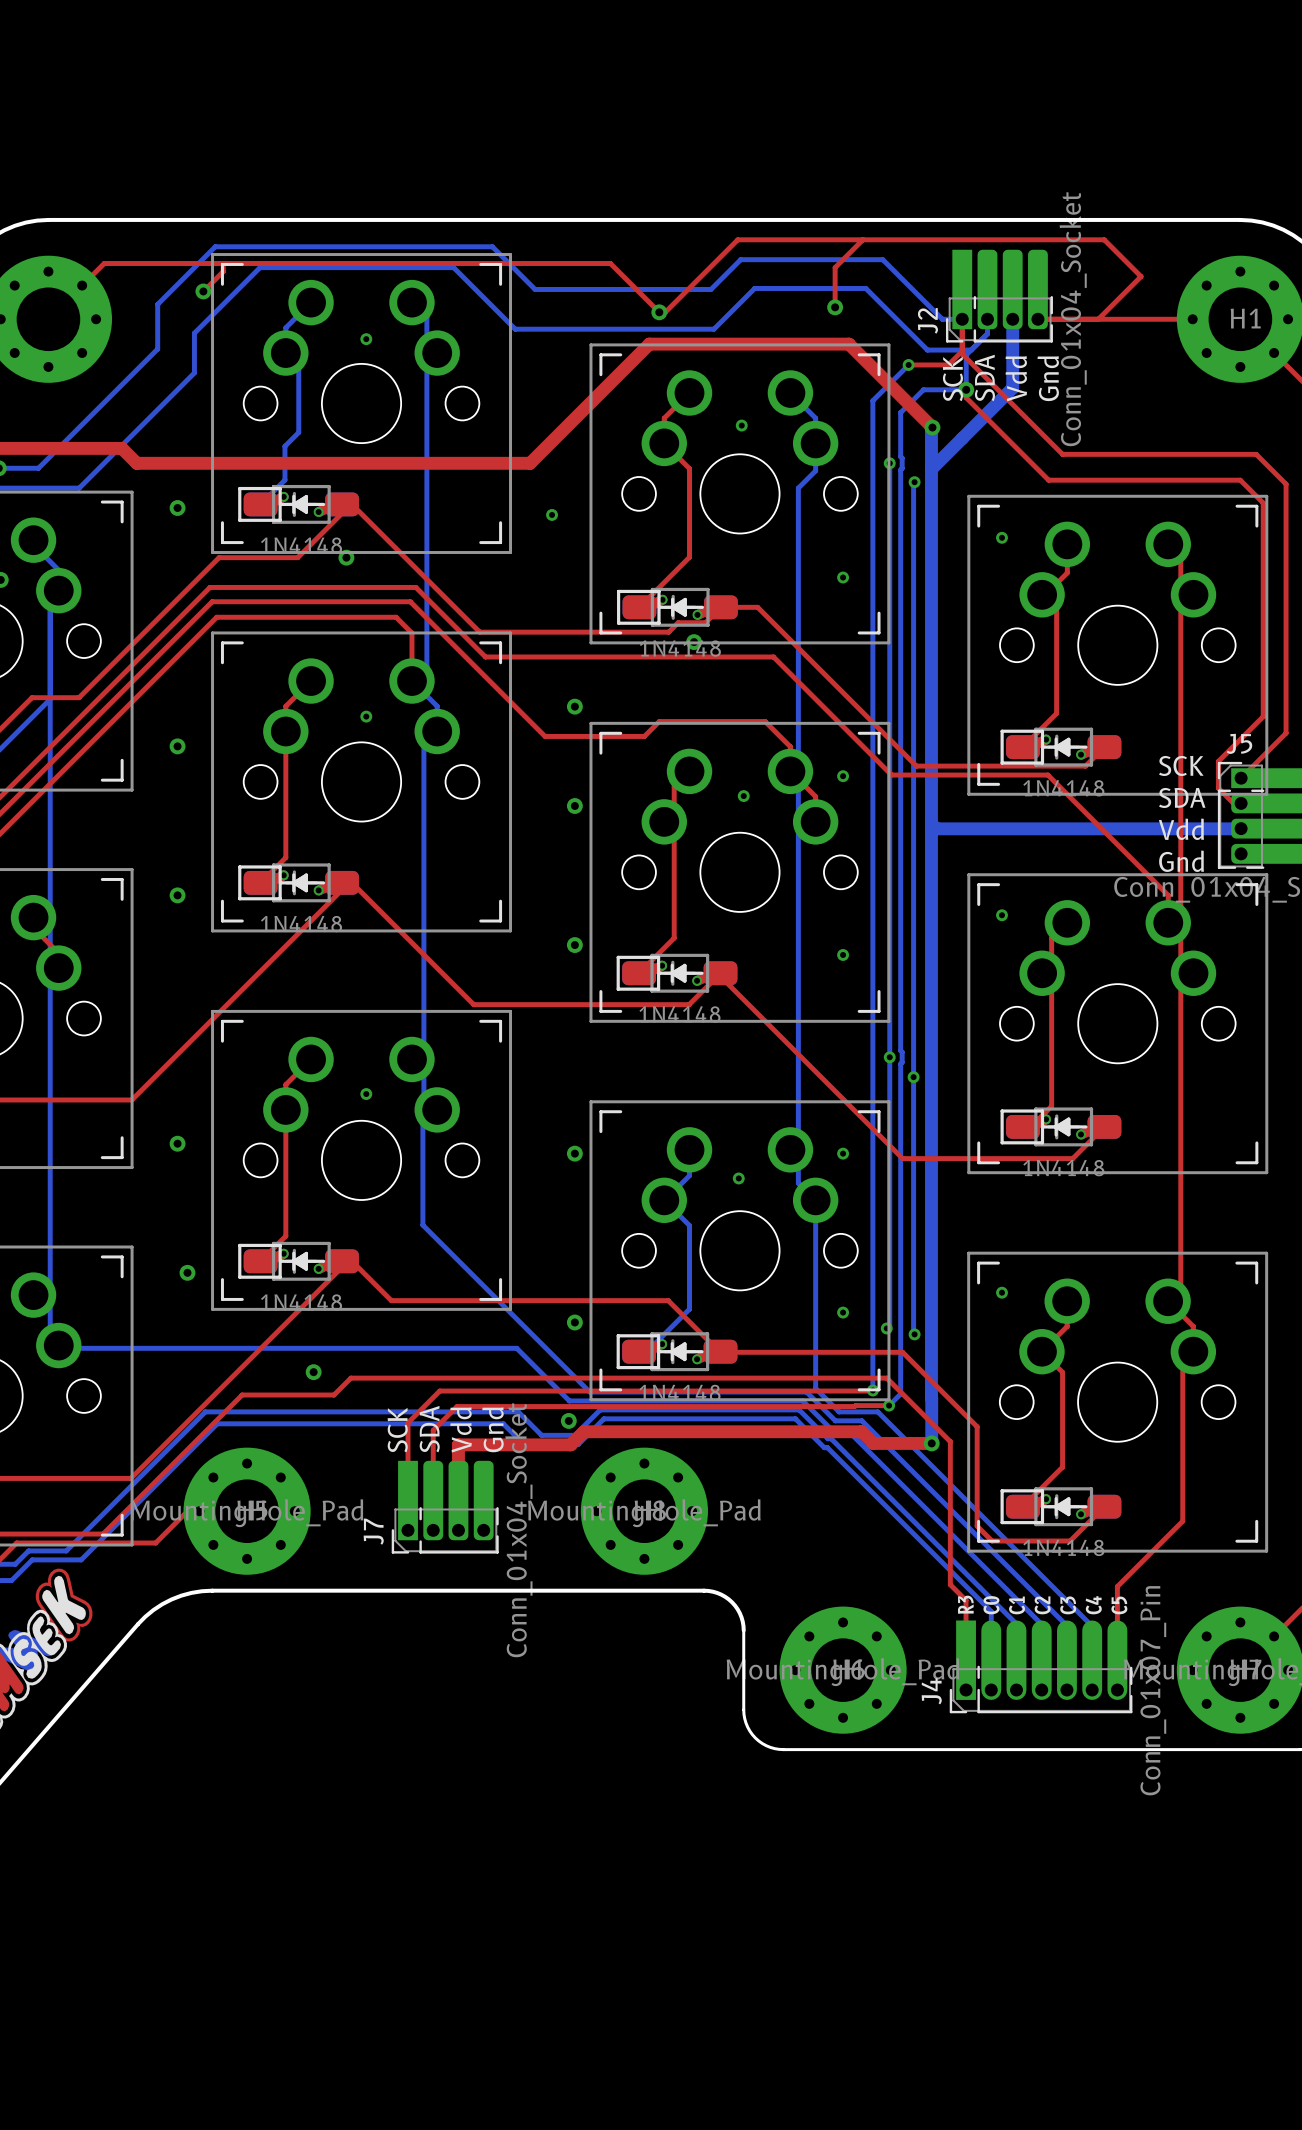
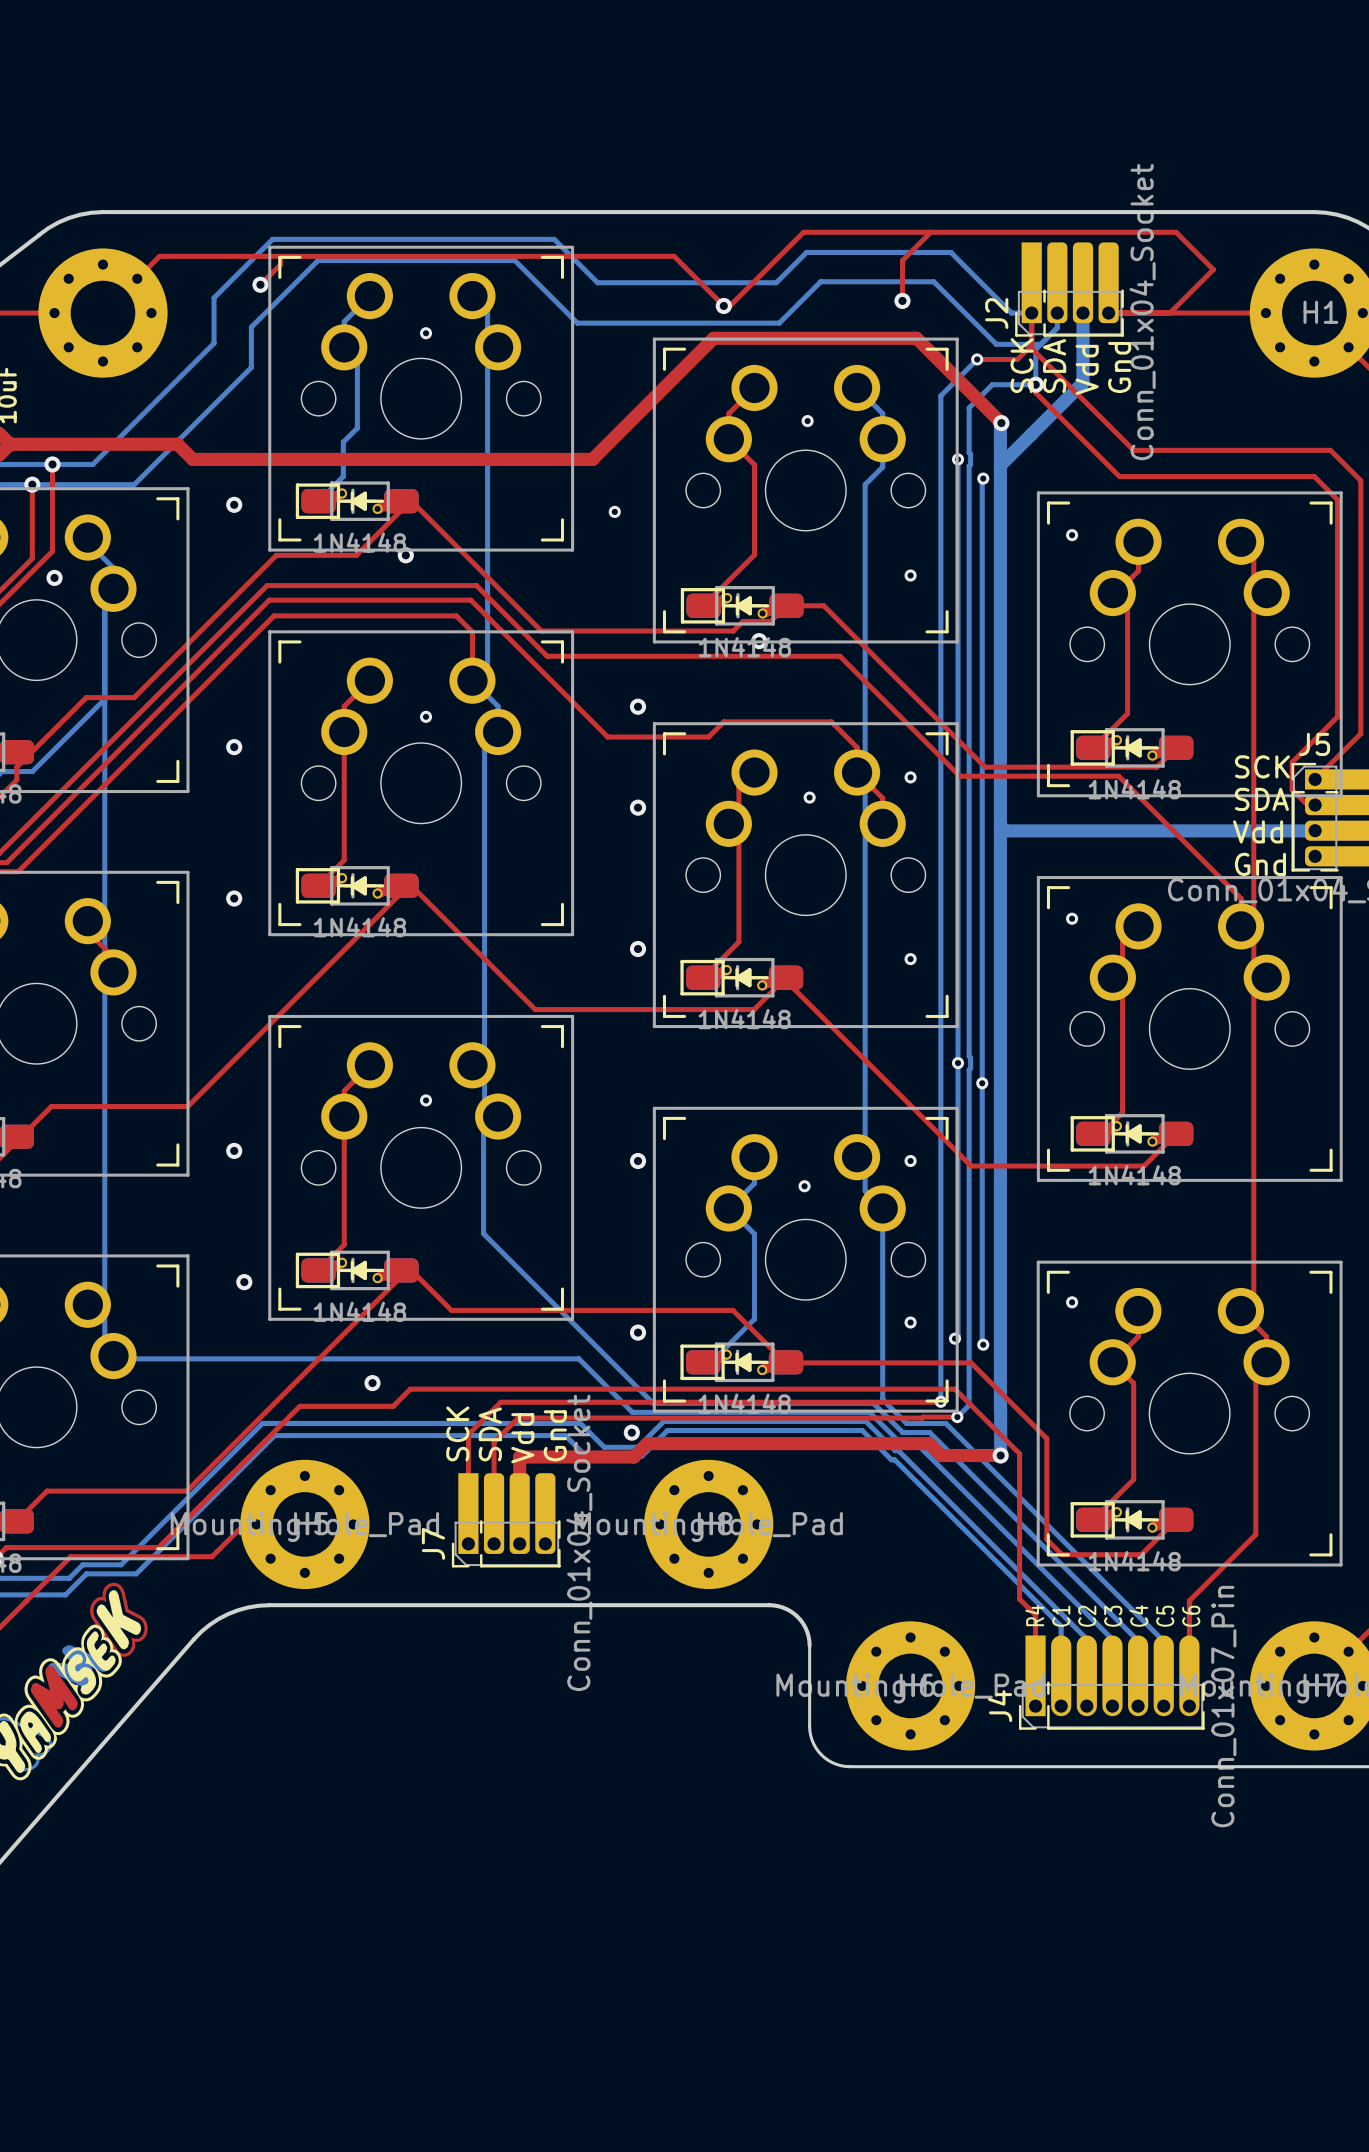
text: R3 (965, 1604) -> R4 (1034, 1615)
text: C0 (991, 1605) -> C1 (1061, 1616)
text: C1 (1016, 1605) -> C2 (1087, 1616)
text: C2 (1042, 1605) -> C3 (1113, 1616)
text: C3 (1068, 1605) -> C4 (1138, 1615)
text: C4 (1093, 1605) -> C5 (1165, 1616)
text: C5 (1119, 1605) -> C6 (1191, 1616)

